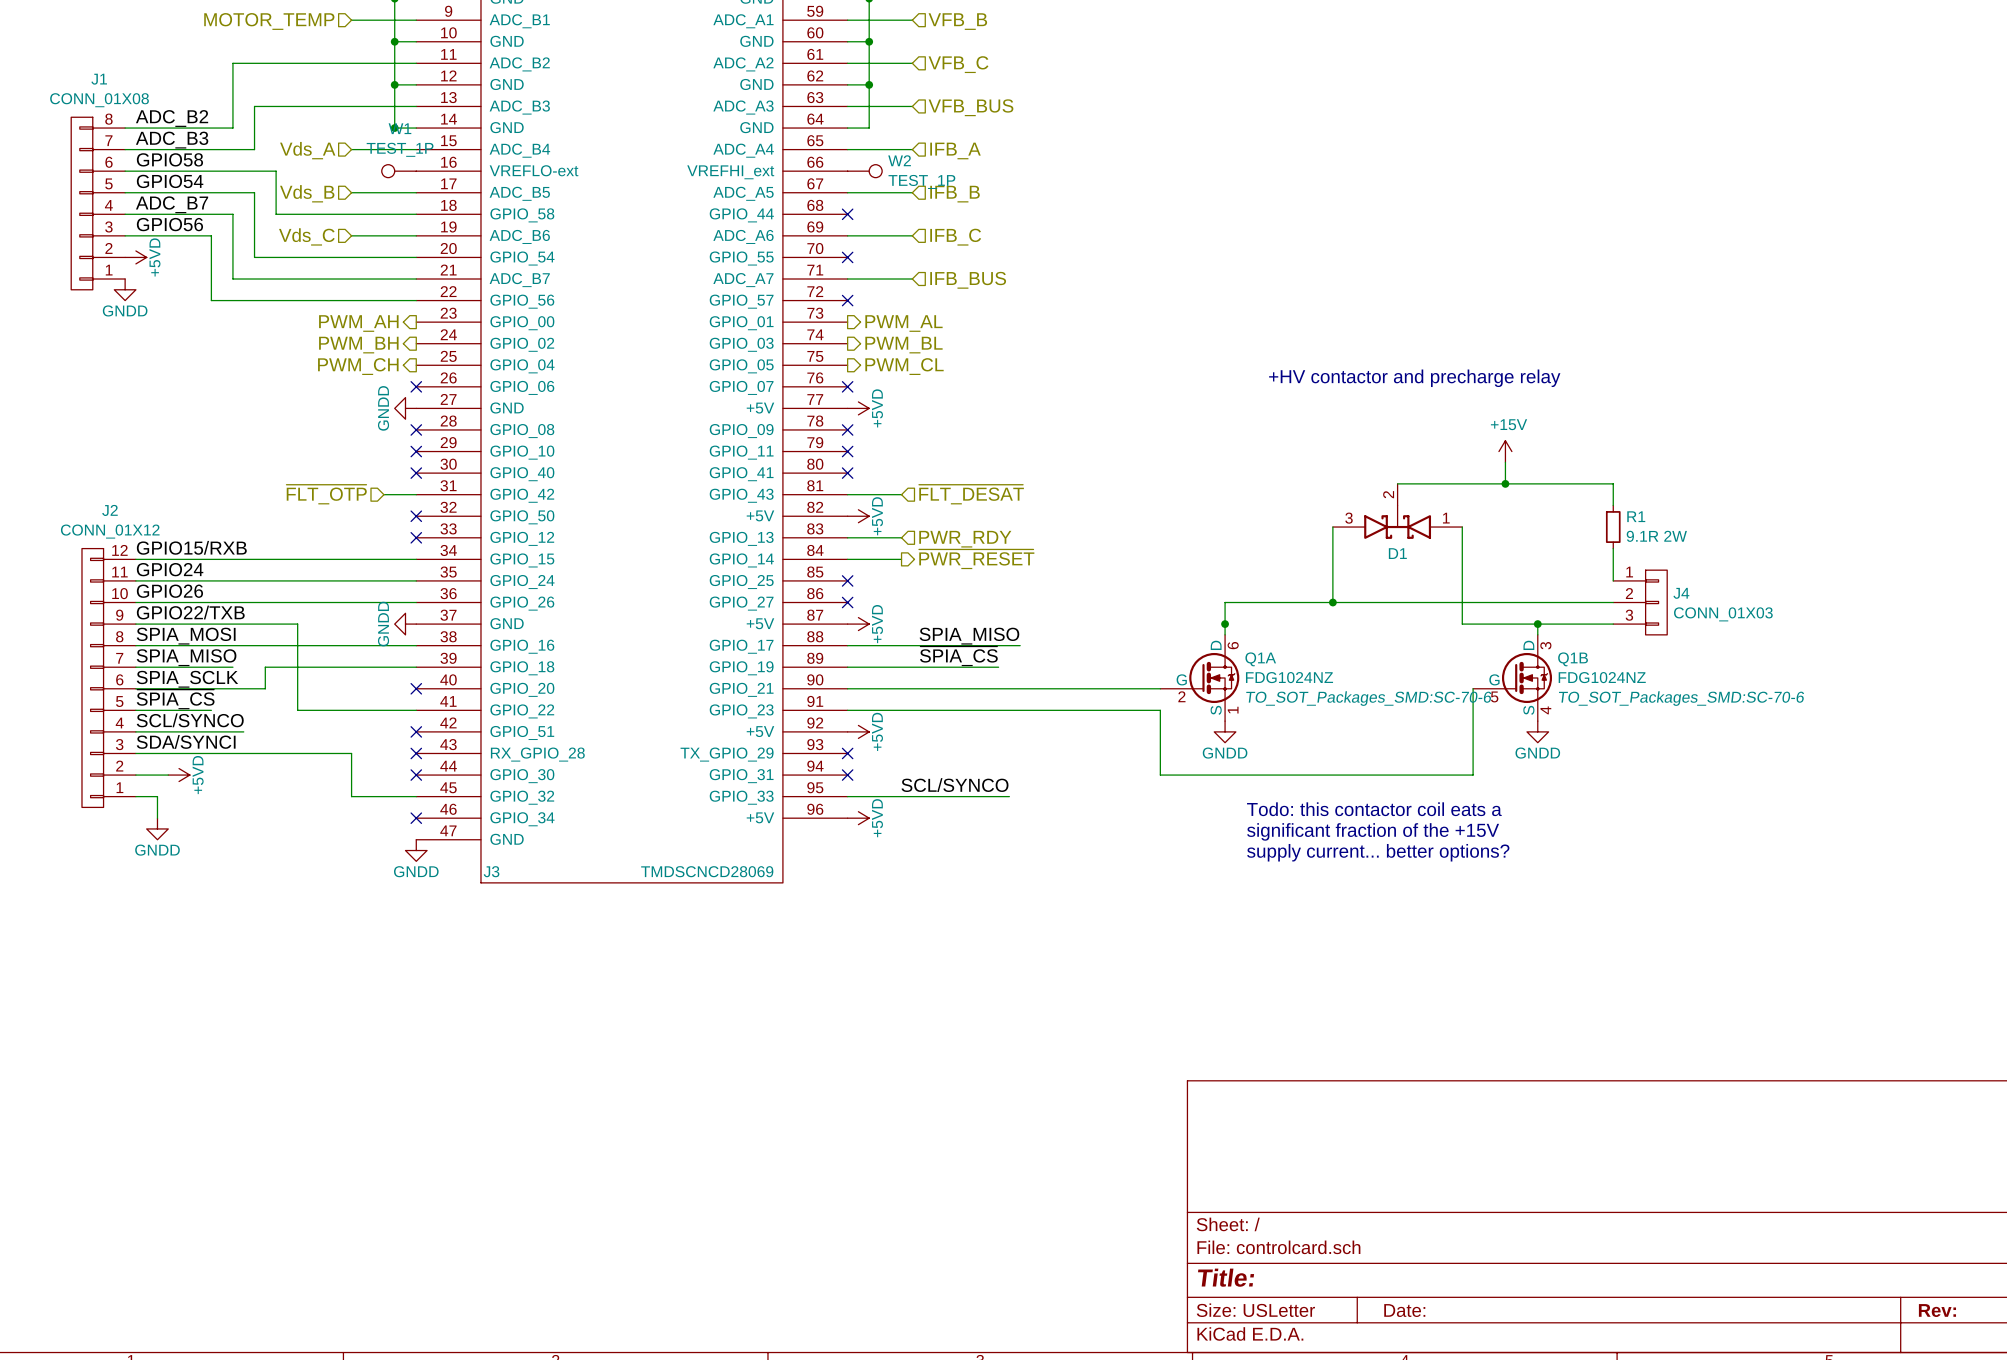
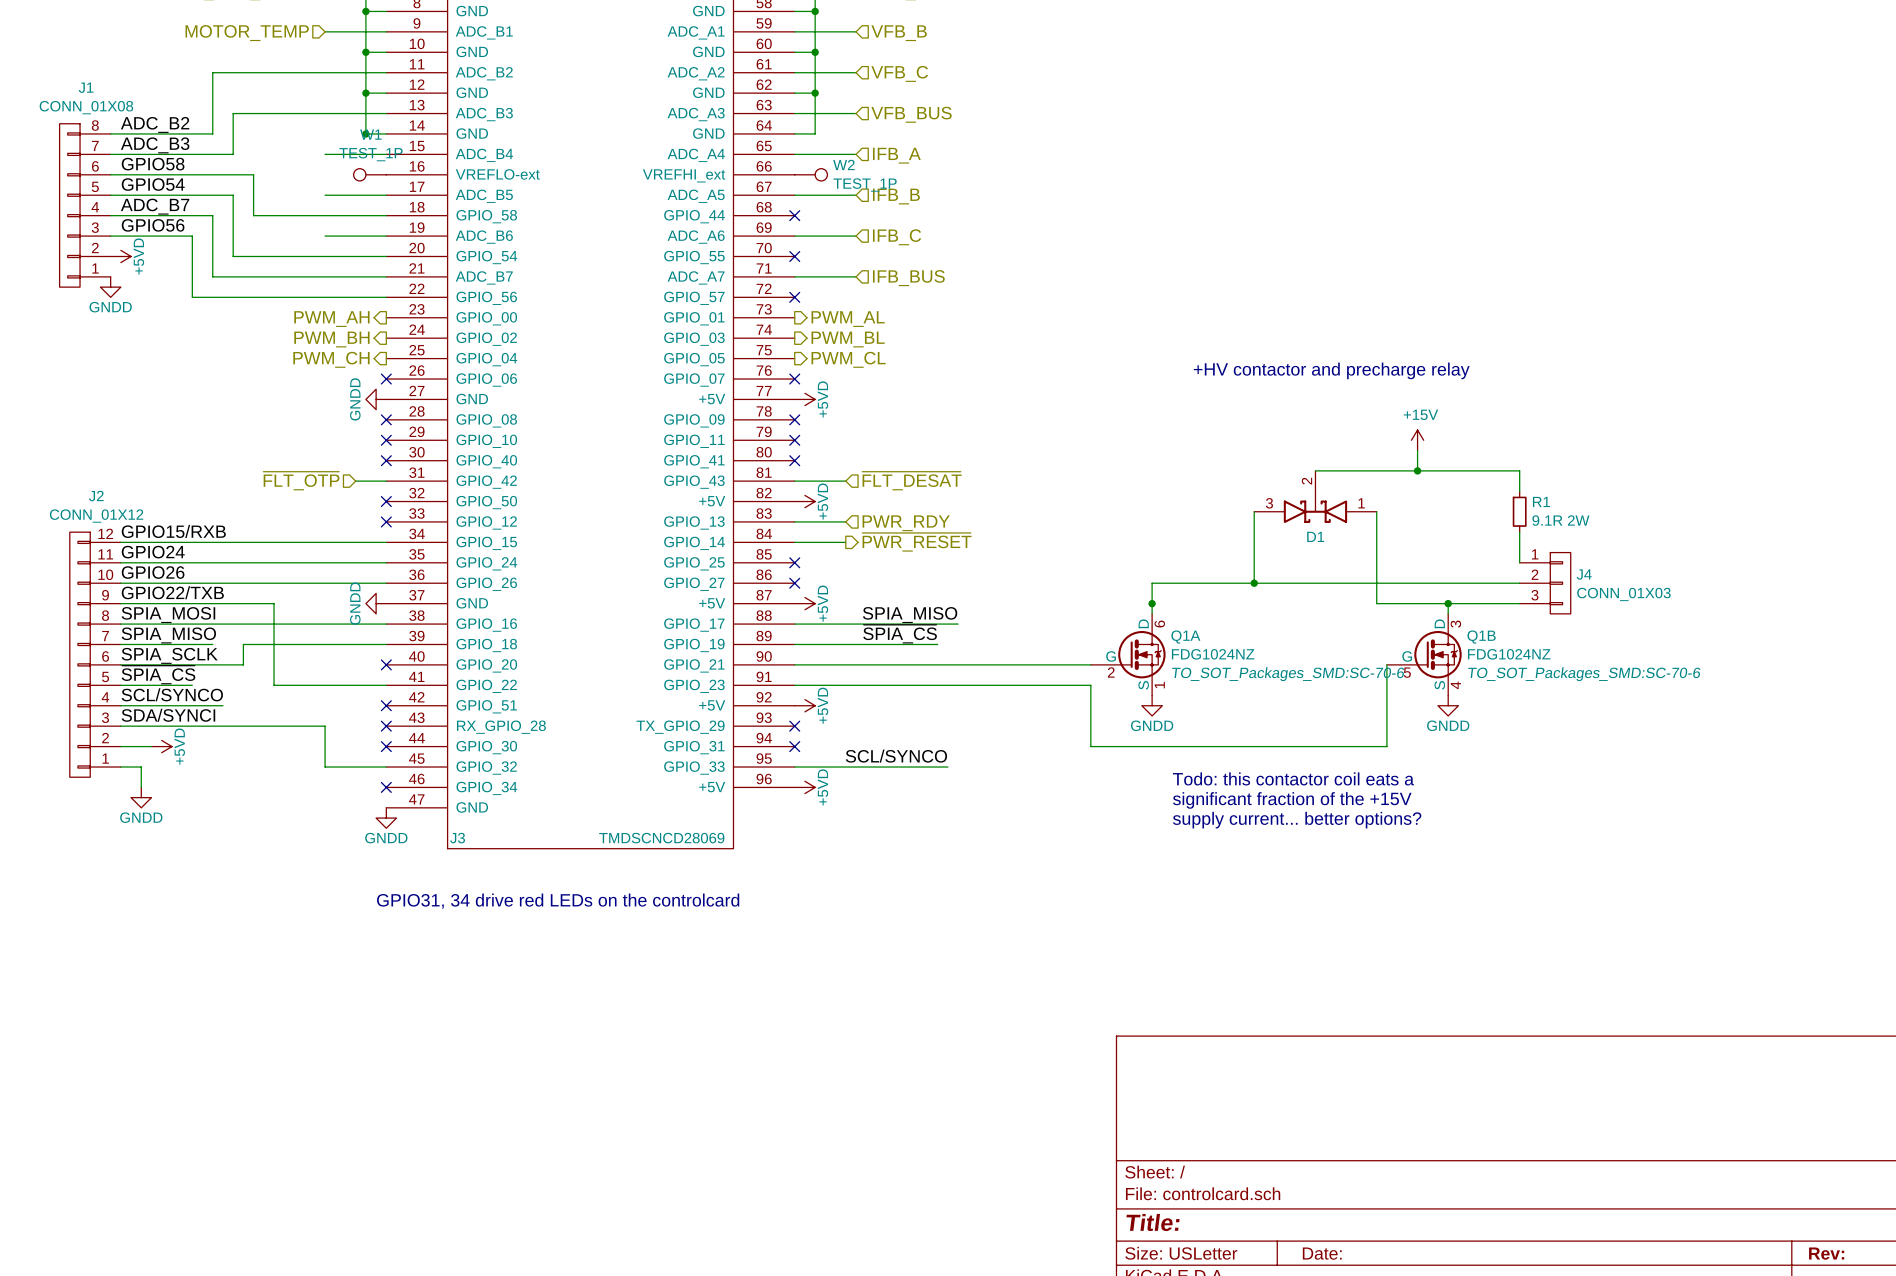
hierarchical label: Vds_A (307, 150) -> none
hierarchical label: Vds_B (307, 193) -> none
hierarchical label: Vds_C (306, 236) -> none
text: none -> GPIO31, 34 drive red LEDs on the controlcard (558, 901)

